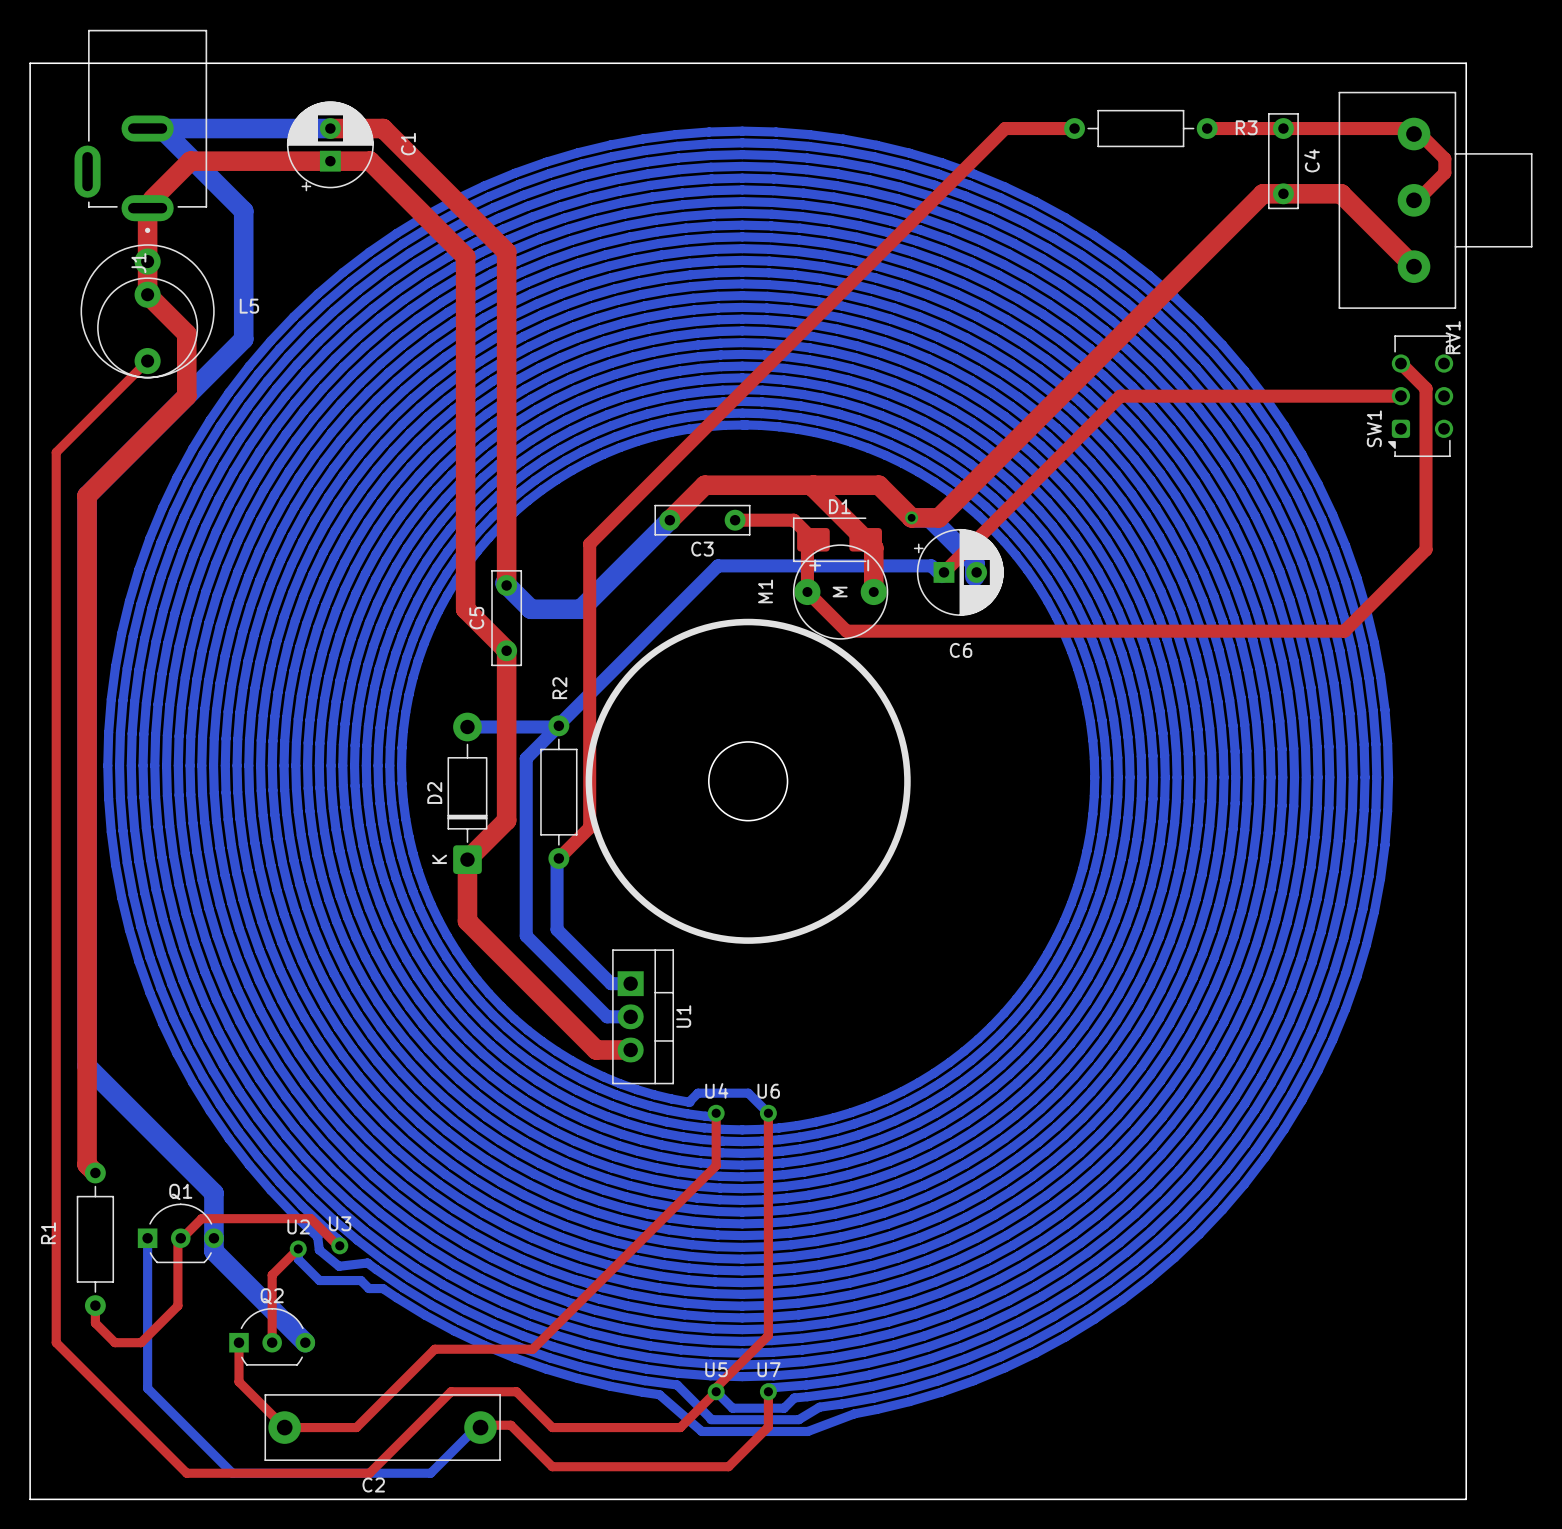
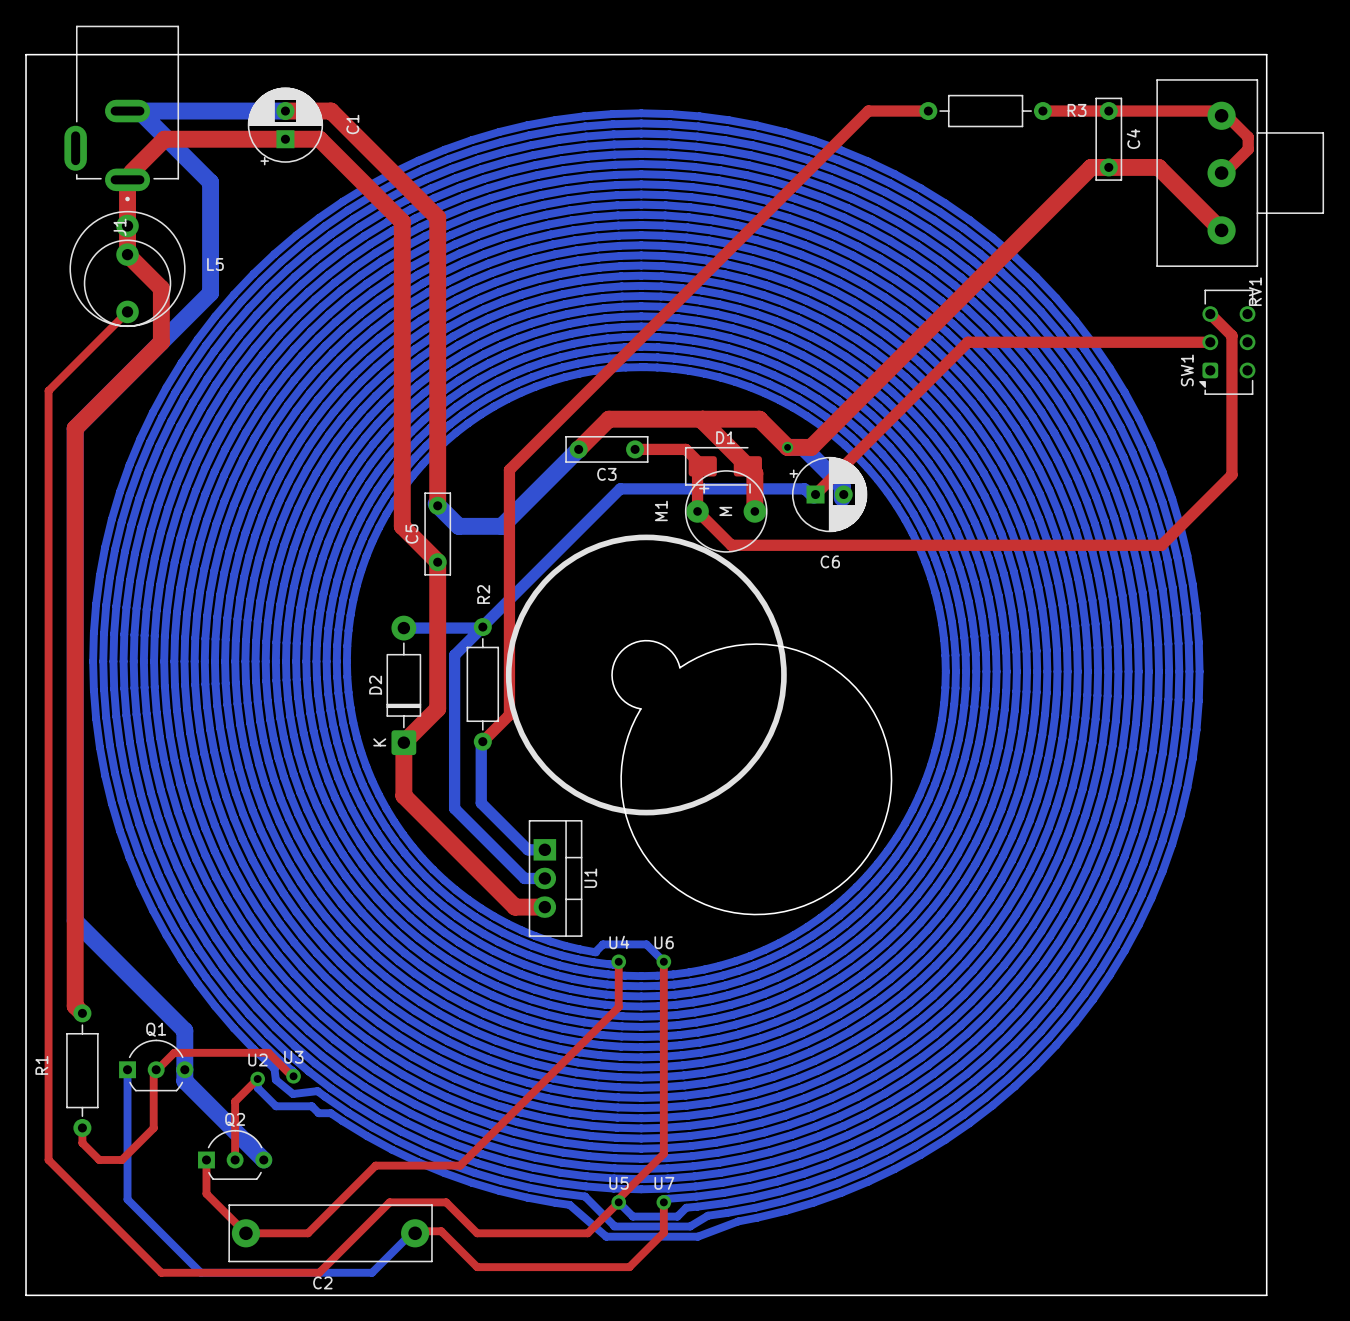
round board edge: [708, 741, 788, 822] -> none
board edge: none -> (679, 667) (688, 662) (697, 657) (726, 647) (756, 644) (786, 647) (806, 653) (832, 667) (848, 680) (868, 703) (882, 730) (888, 750) (891, 780) (889, 800) (881, 829) (872, 848) (854, 872) (831, 891) (804, 905) (774, 913) (754, 914) (724, 910) (695, 900) (678, 889) (662, 876) (643, 853) (633, 835) (626, 816) (621, 786) (621, 766) (625, 746) (631, 726) (640, 708) (625, 701) (616, 691) (612, 679) (613, 666) (618, 654) (628, 645) (640, 641) (649, 640) (657, 642) (669, 649) (677, 659) (678, 663) (679, 667)

